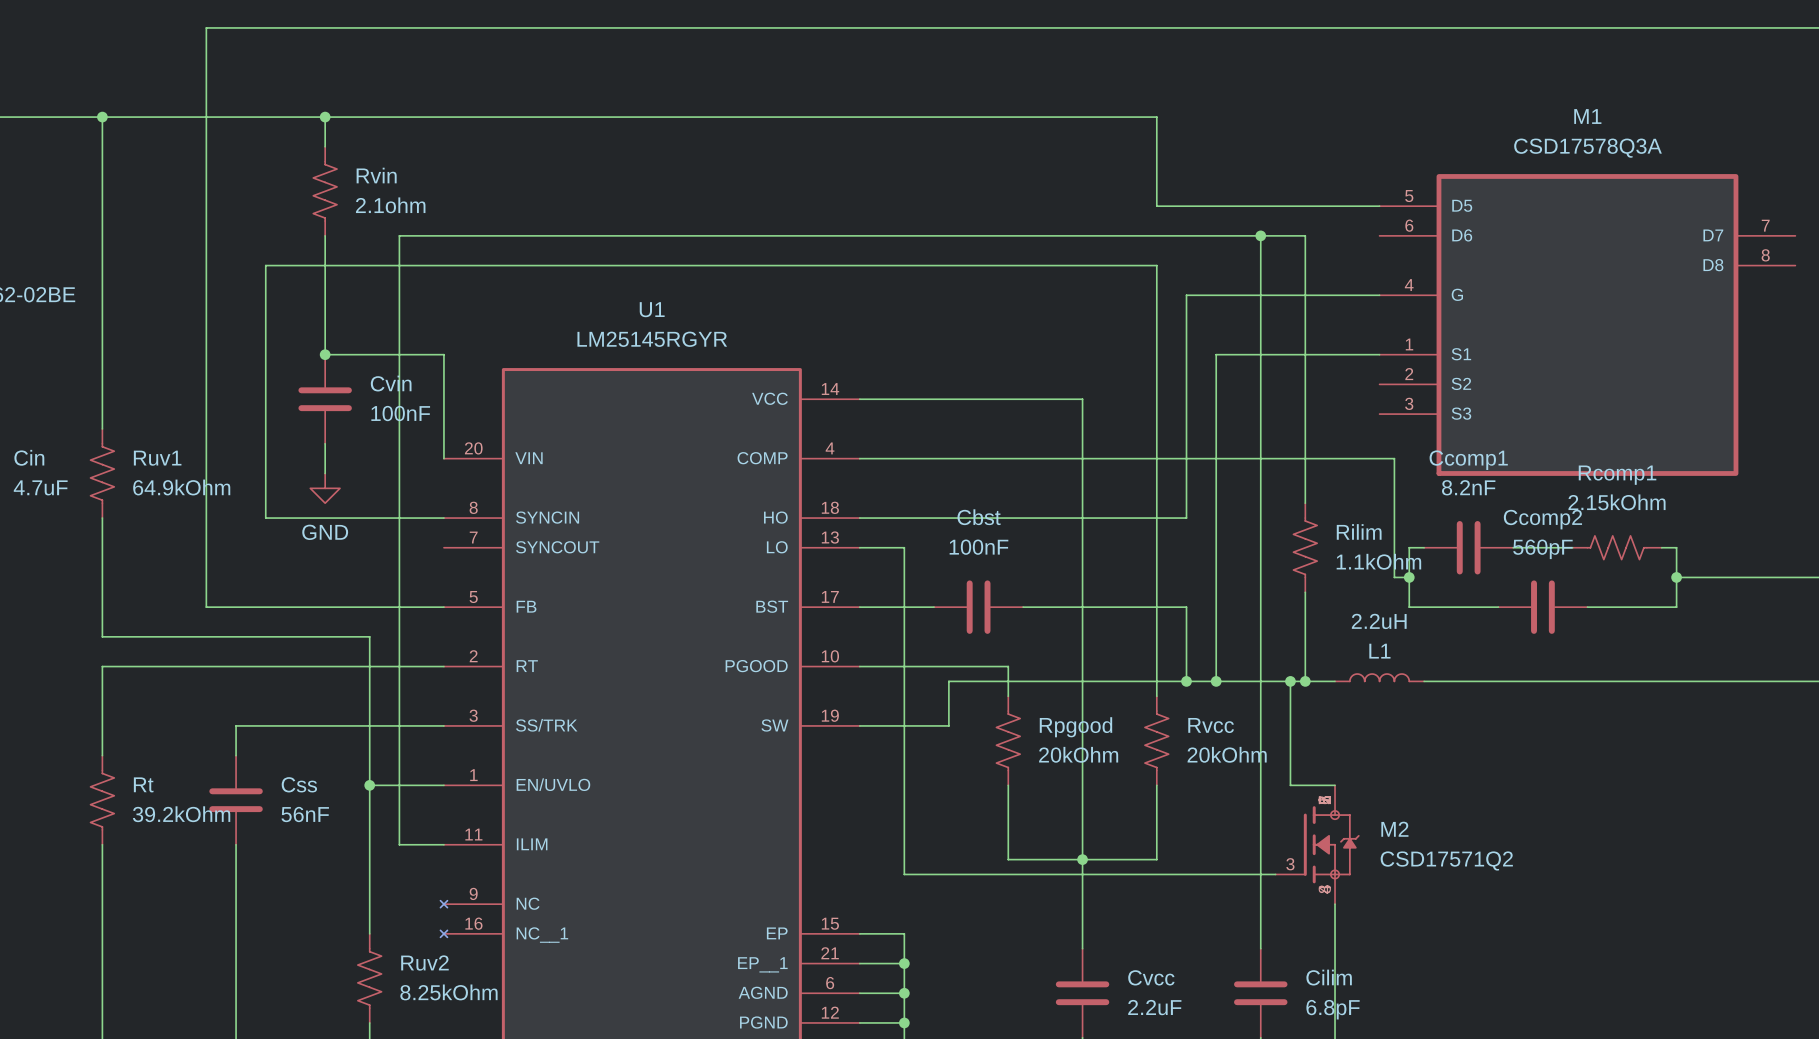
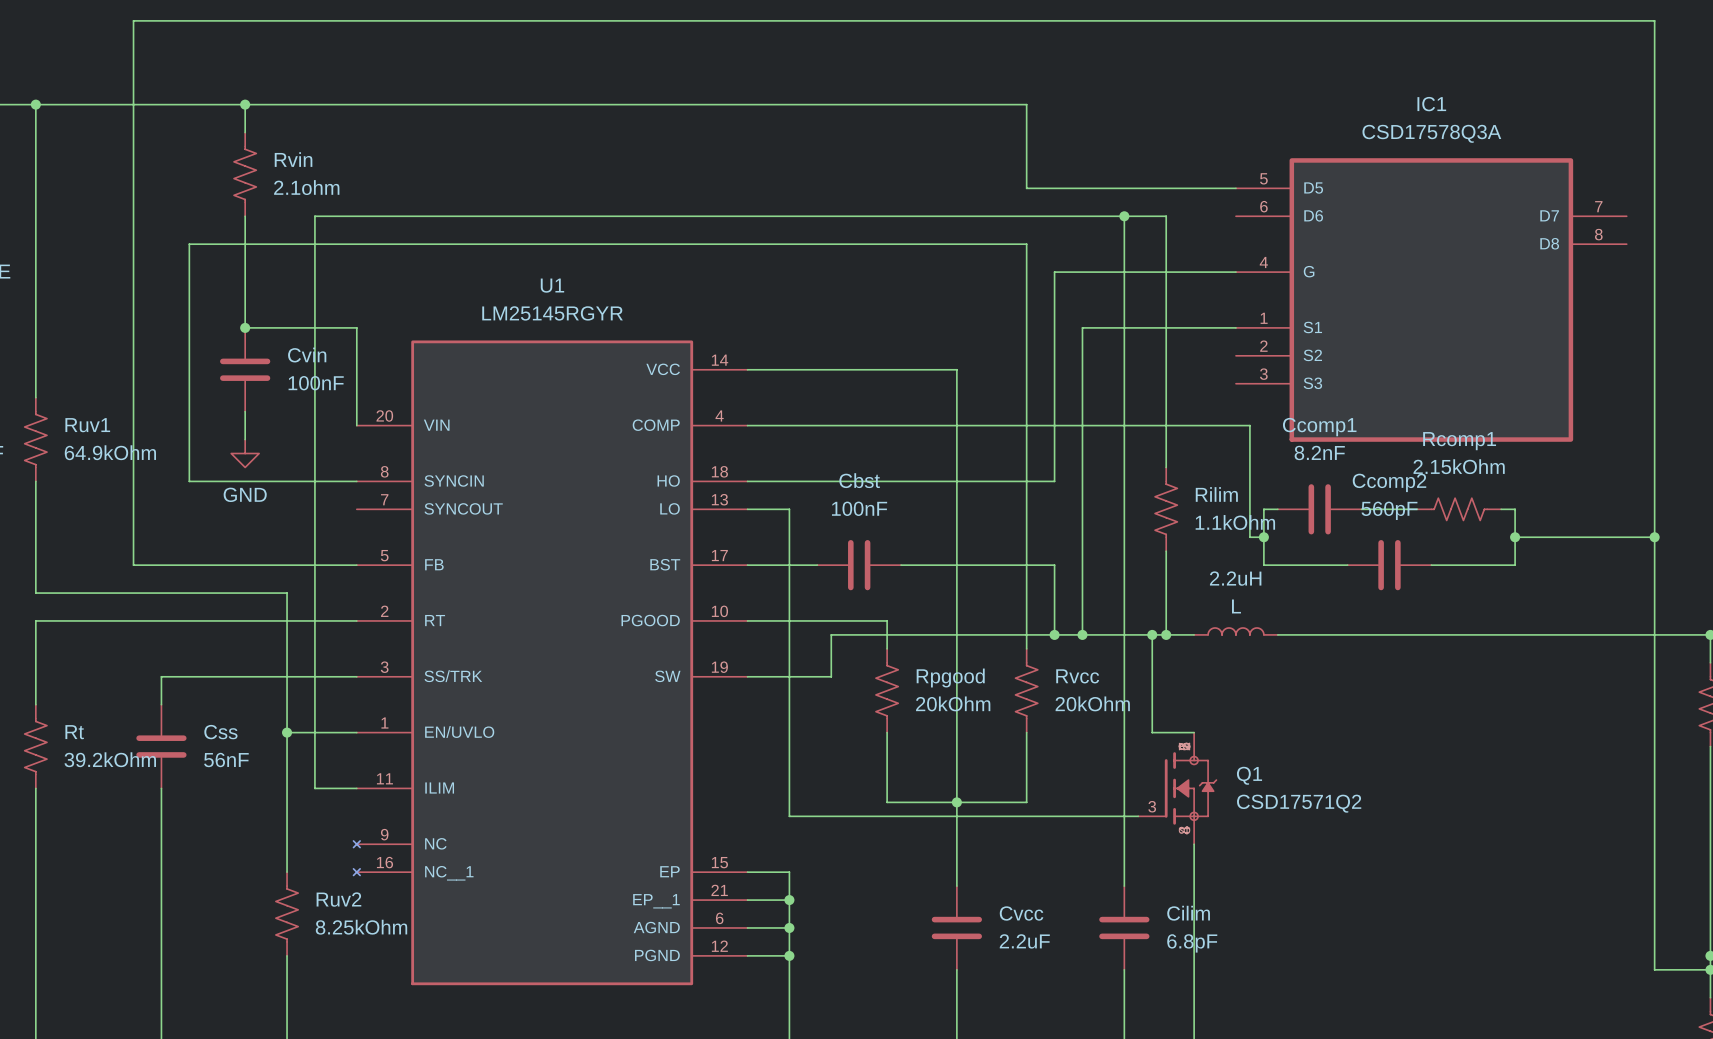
M1 name: M1 (1587, 116) -> IC1 (1431, 104)
2.2uH value: L1 (1379, 651) -> L (1236, 606)
M2 name: M2 (1394, 829) -> Q1 (1249, 775)

